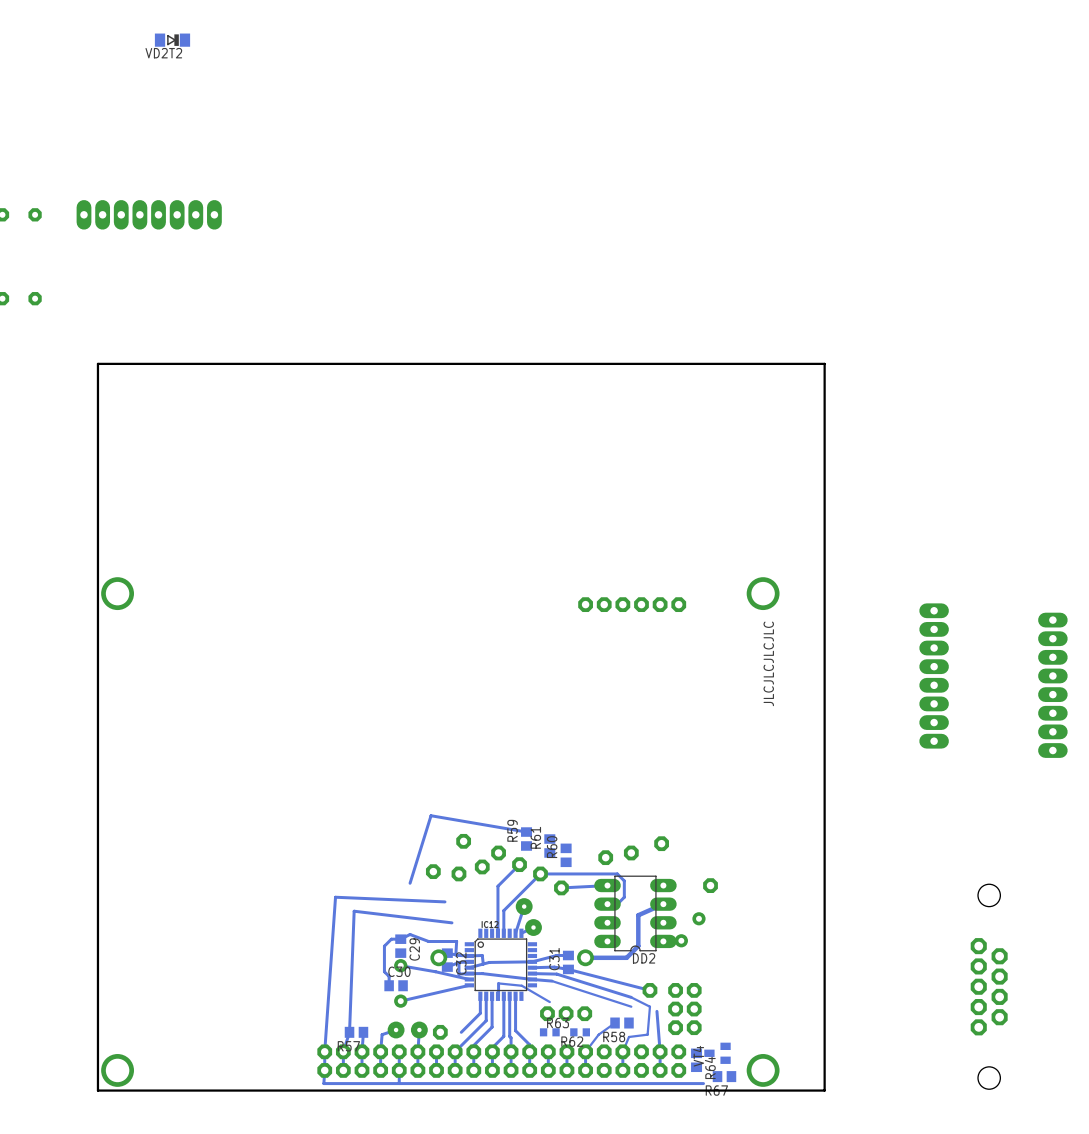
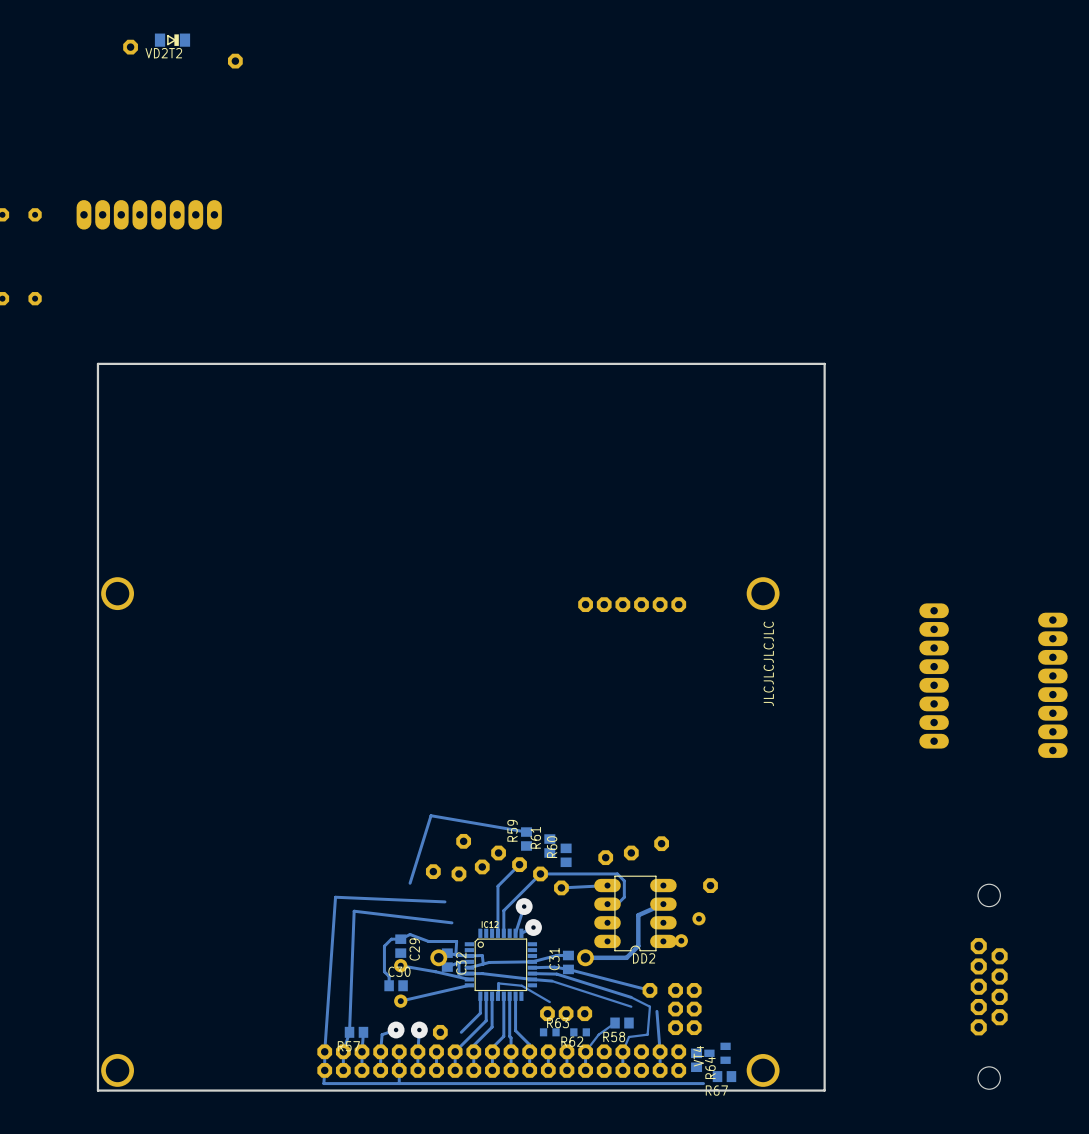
part: none -> (130, 47)
part: none -> (235, 61)

